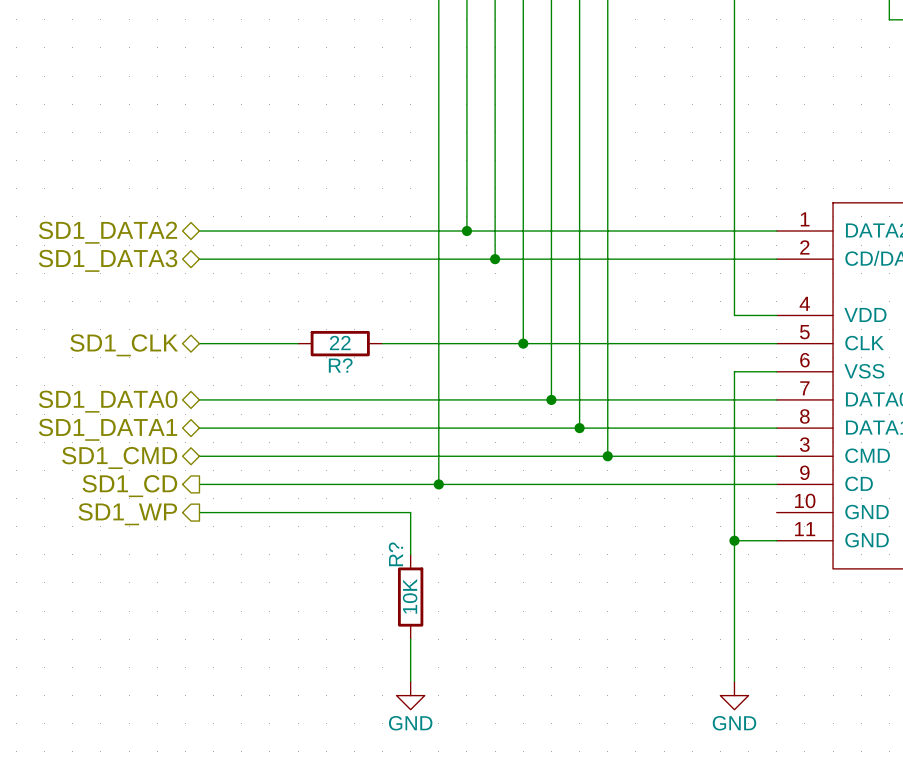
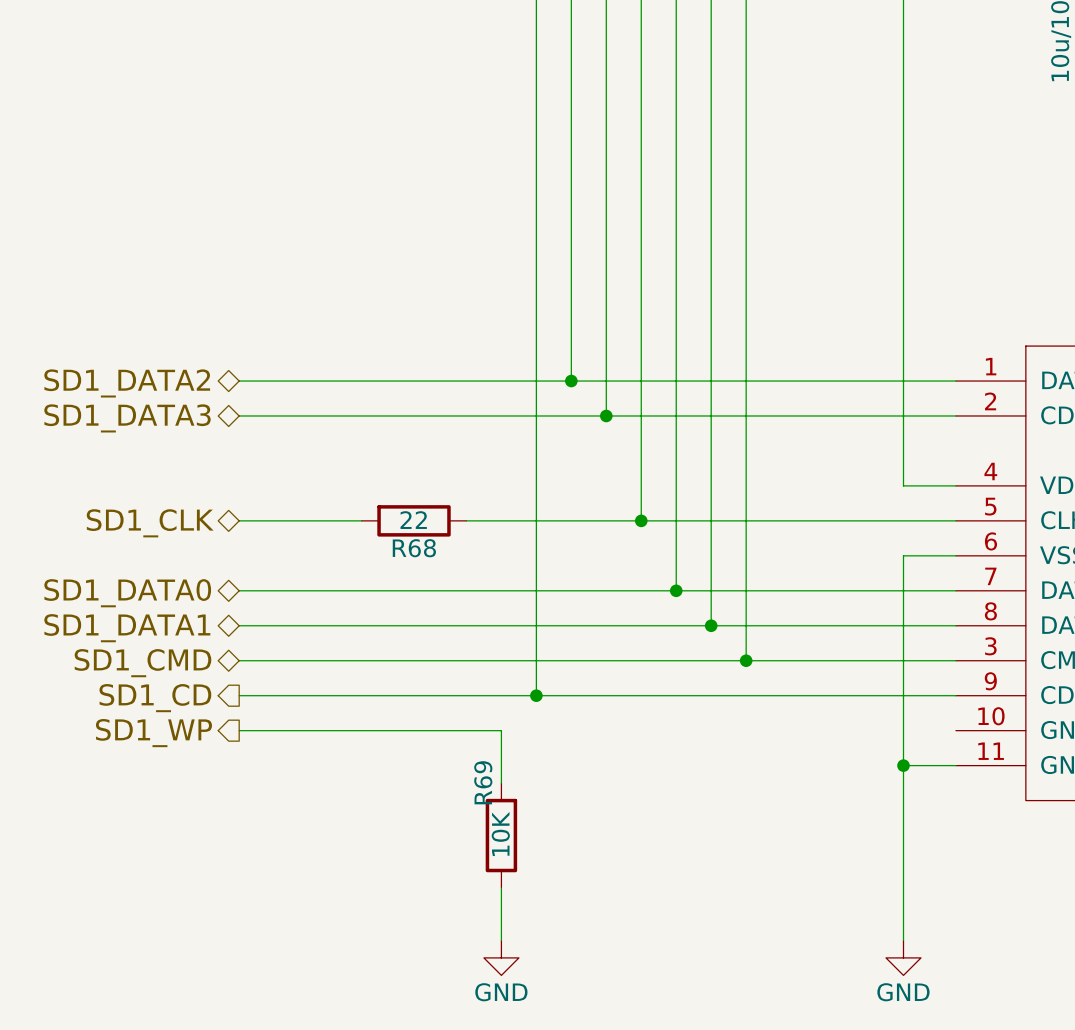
R? name: R? (340, 365) -> R68 (414, 548)
R? name: R? (395, 554) -> R69 (483, 782)

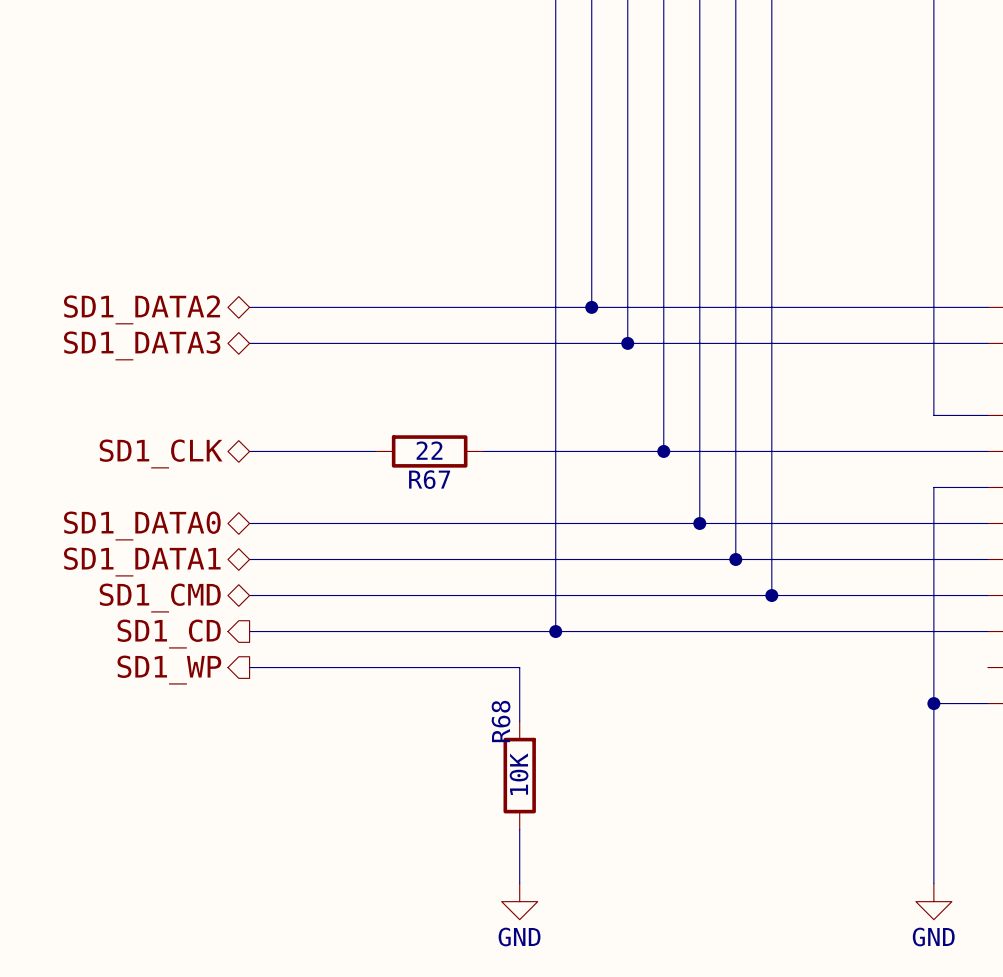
R68 name: R68 (414, 548) -> R67 (429, 479)
R69 name: R69 (483, 782) -> R68 (501, 721)

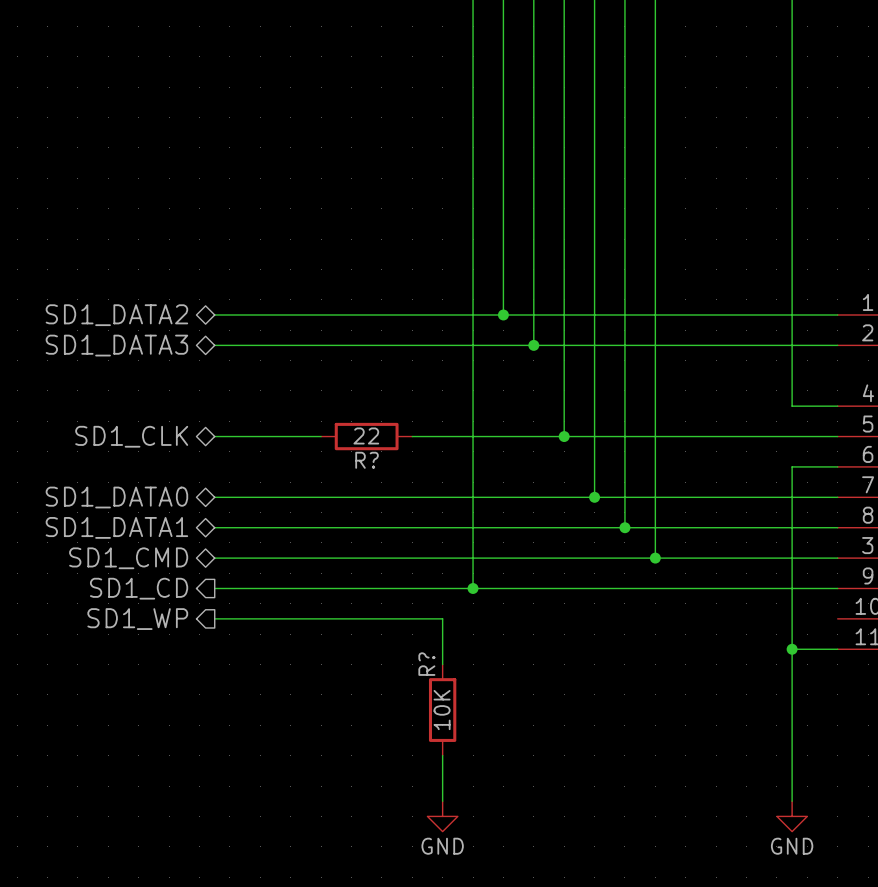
R67 name: R67 (429, 479) -> R? (367, 460)
R68 name: R68 (501, 721) -> R? (426, 664)

